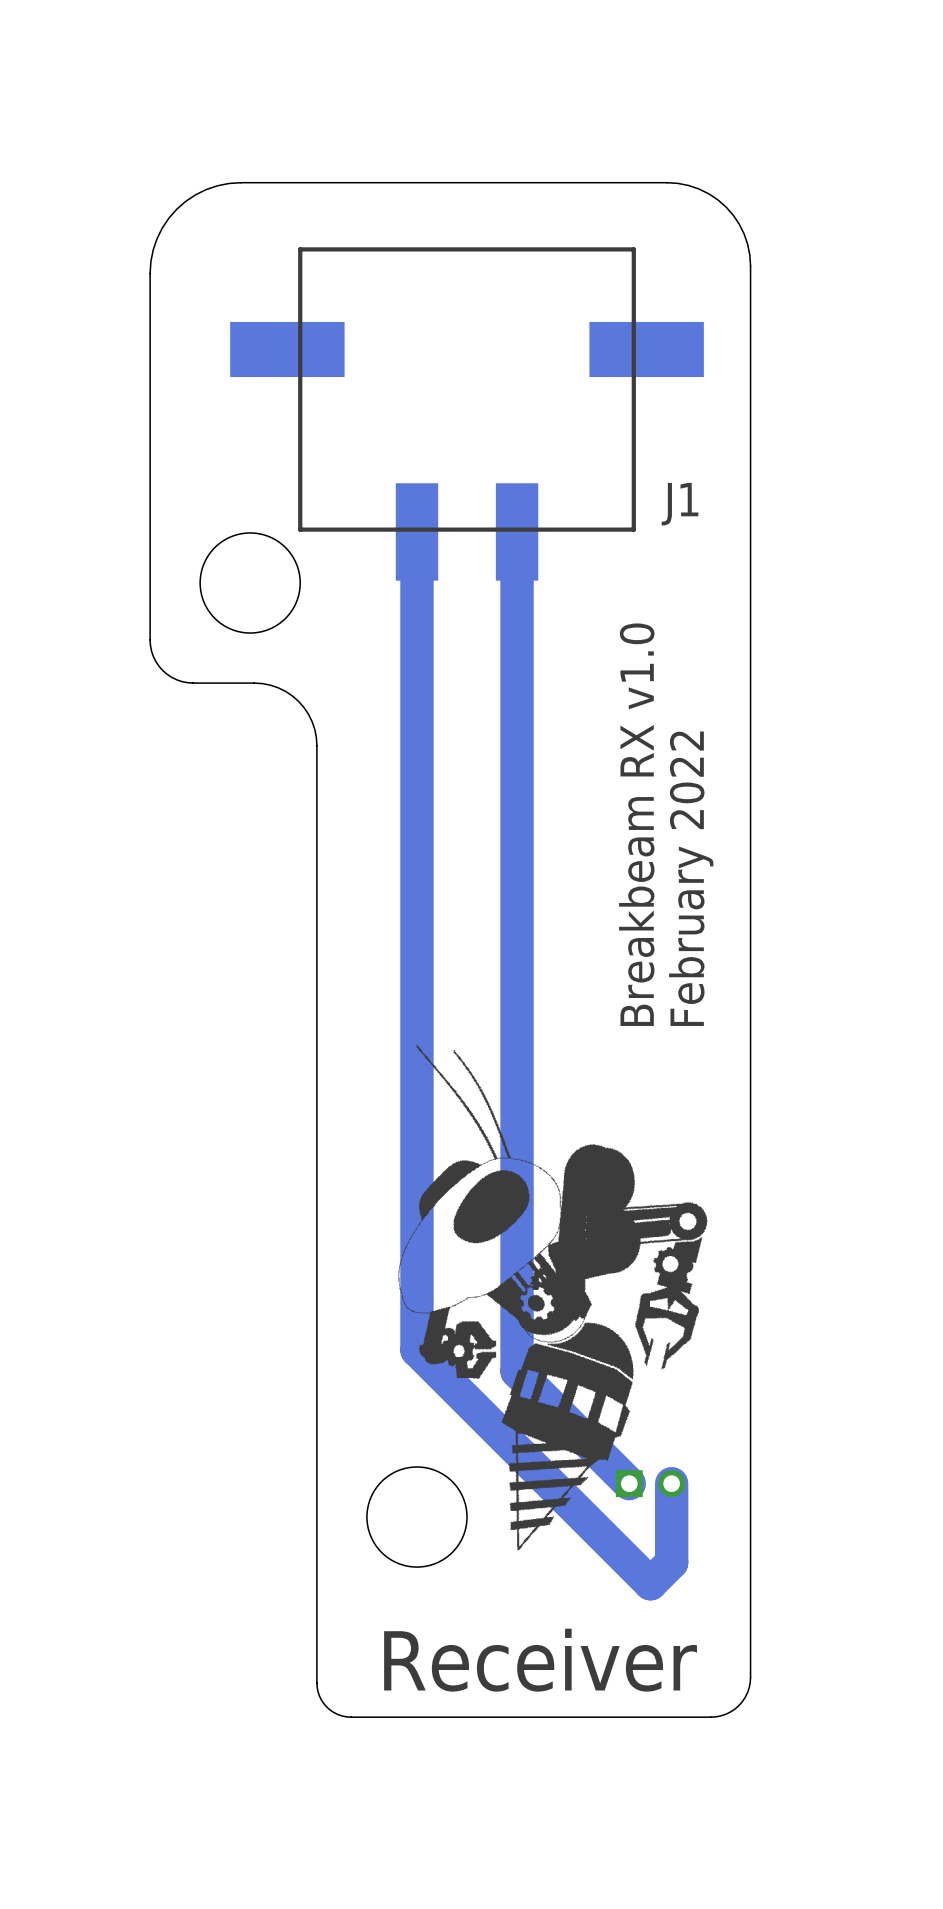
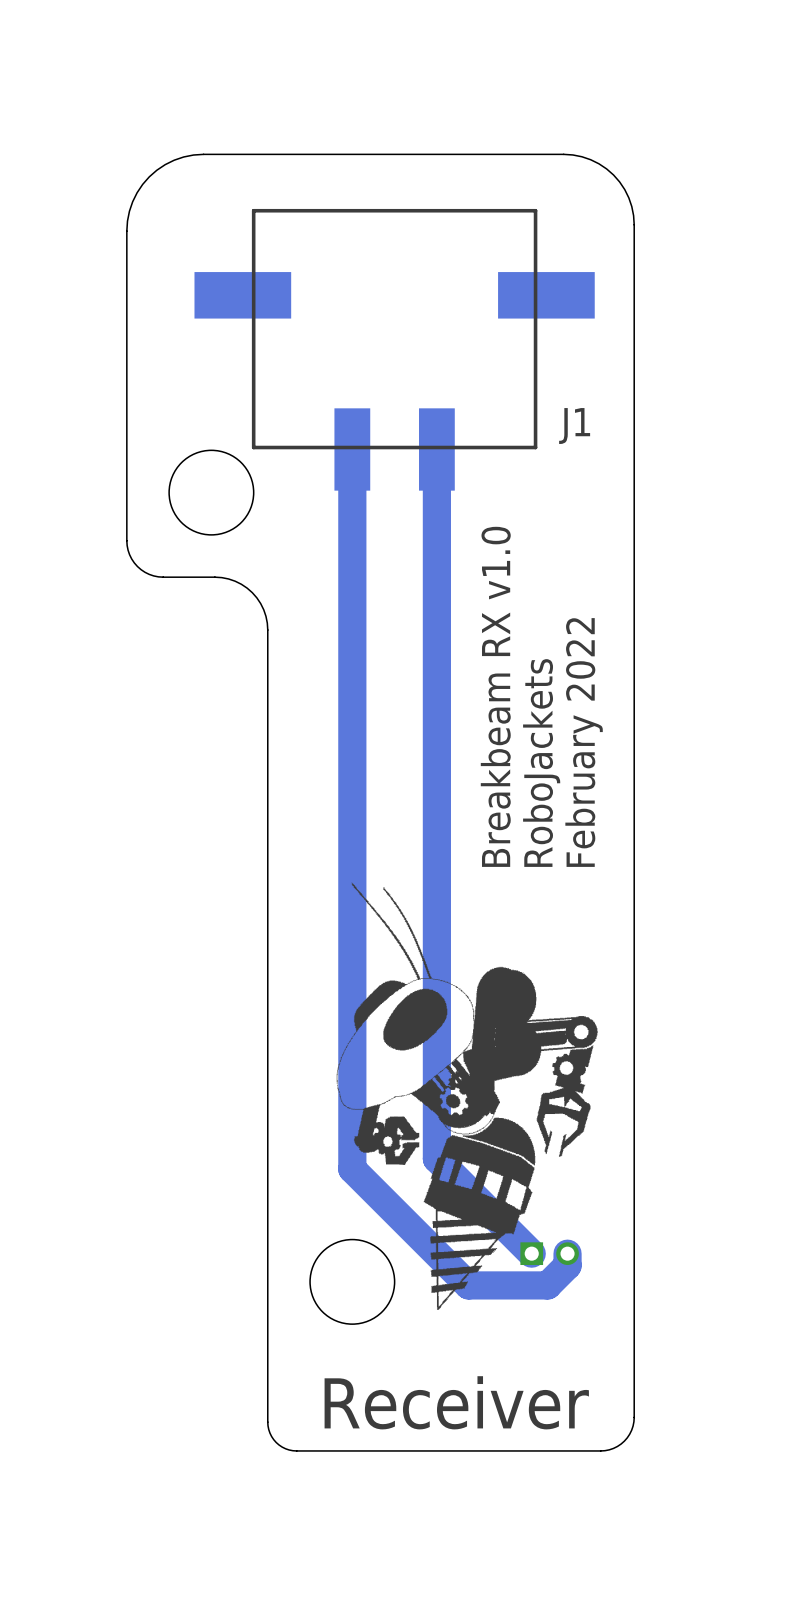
text: none -> Breakbeam RX v1.0 (495, 696)
text: Breakbeam RX v1.0 (636, 824) -> RoboJackets (541, 763)
bottom track: (416, 1350) (650, 1583) (671, 1562) (671, 1497) -> (352, 1140) (352, 1169) (468, 1285) (547, 1285) (567, 1265)

